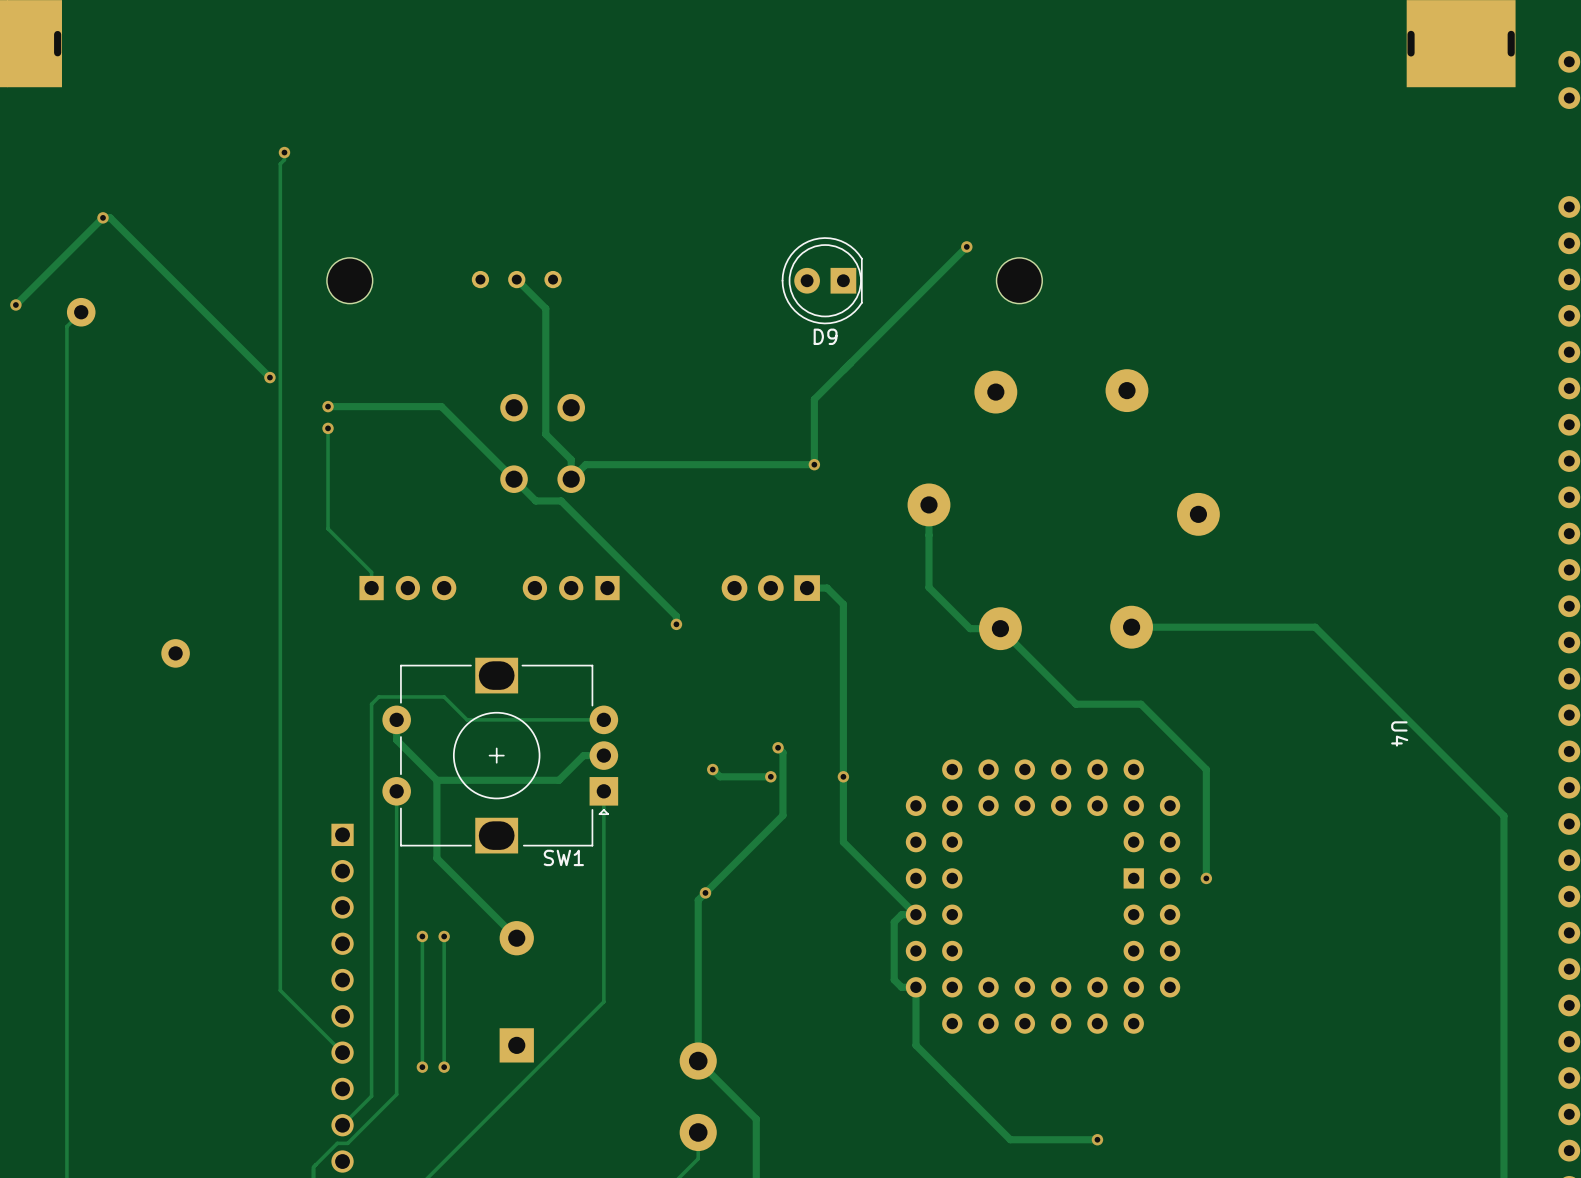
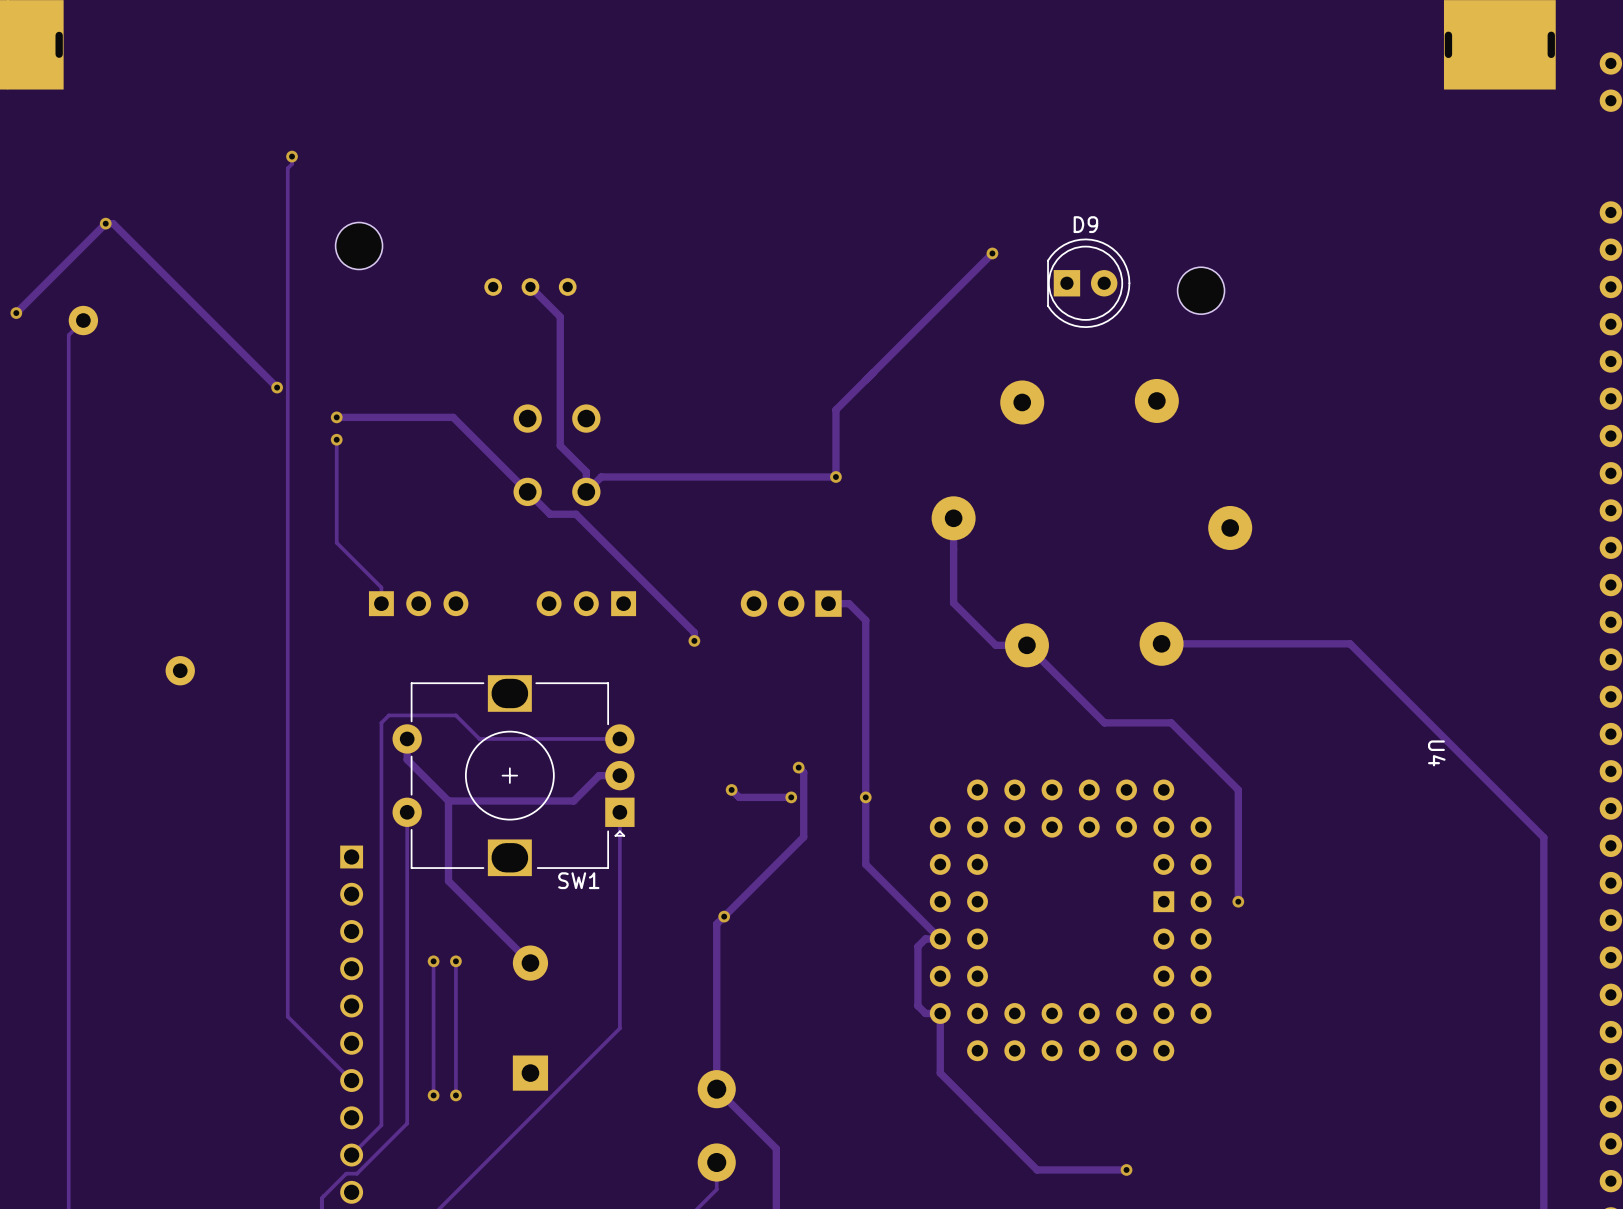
part position: (349, 280) -> (359, 246)
D9 rotation: 0° (822, 280) -> 180° (1088, 283)
D9 position: (822, 280) -> (1088, 283)
part position: (1019, 280) -> (1201, 290)

